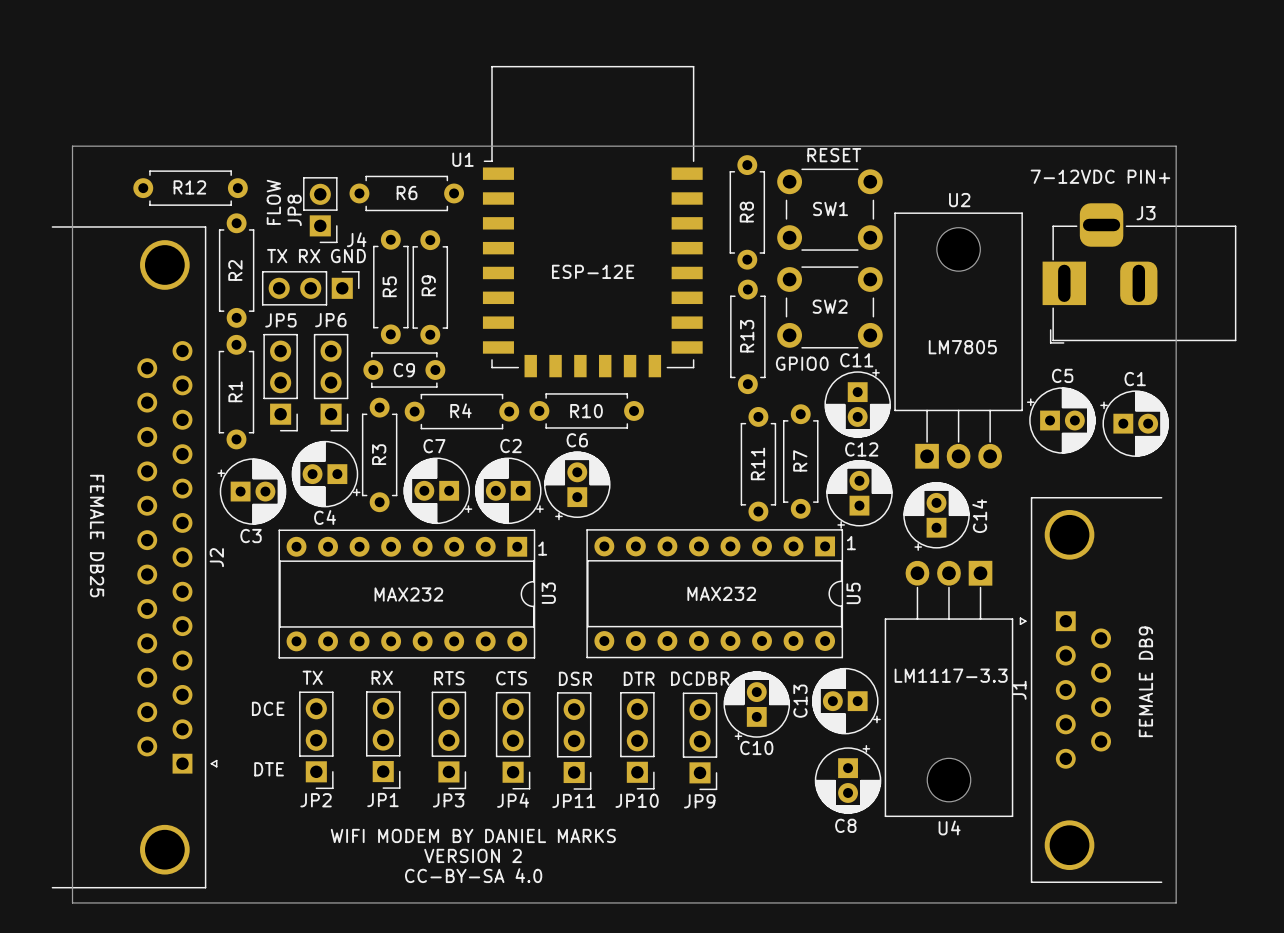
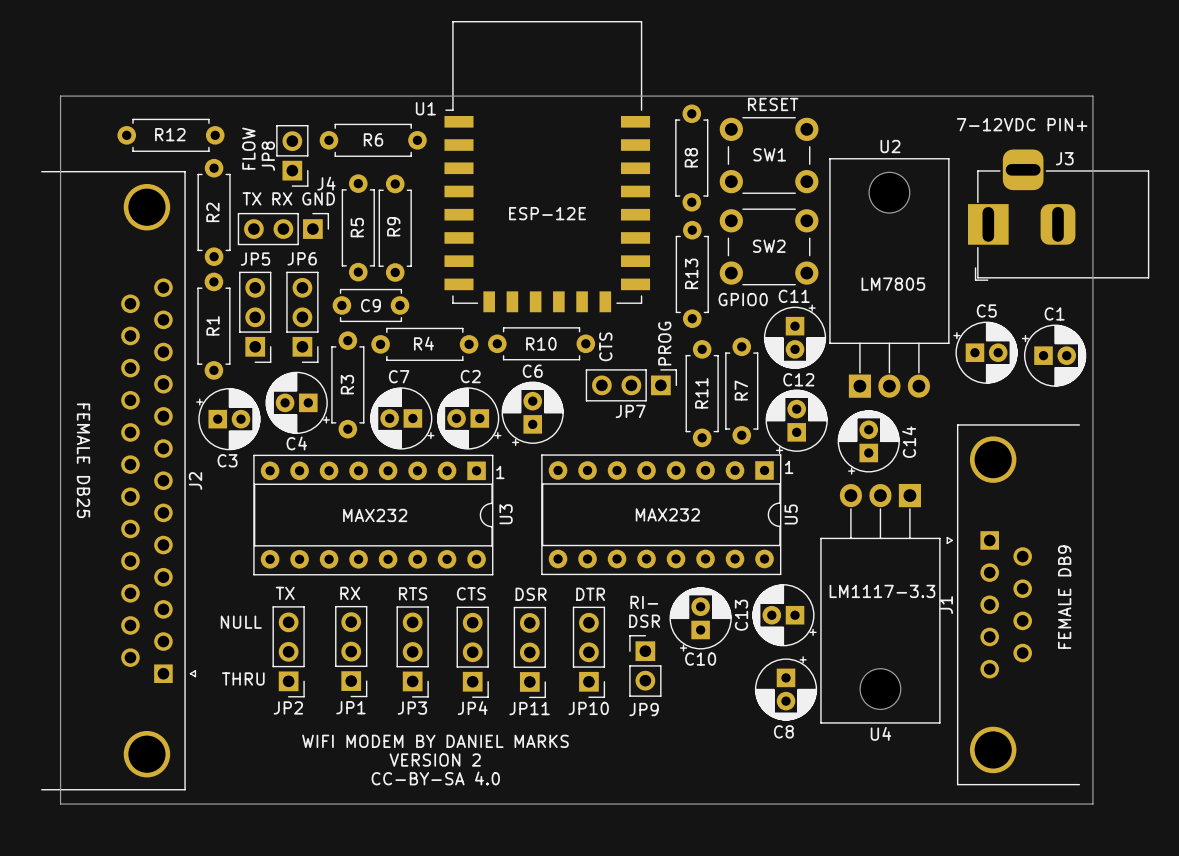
text: none -> PROG (664, 343)
text: none -> CTS (605, 346)
JP7: none -> (631, 385)
text: DCDBR (700, 678) -> RI- (644, 602)
JP9 footprint: [682, 692, 718, 791] -> [629, 635, 662, 697]
text: none -> DSR (644, 621)
text: DCE (268, 708) -> NULL (241, 622)
text: DTE (269, 769) -> THRU (243, 678)

